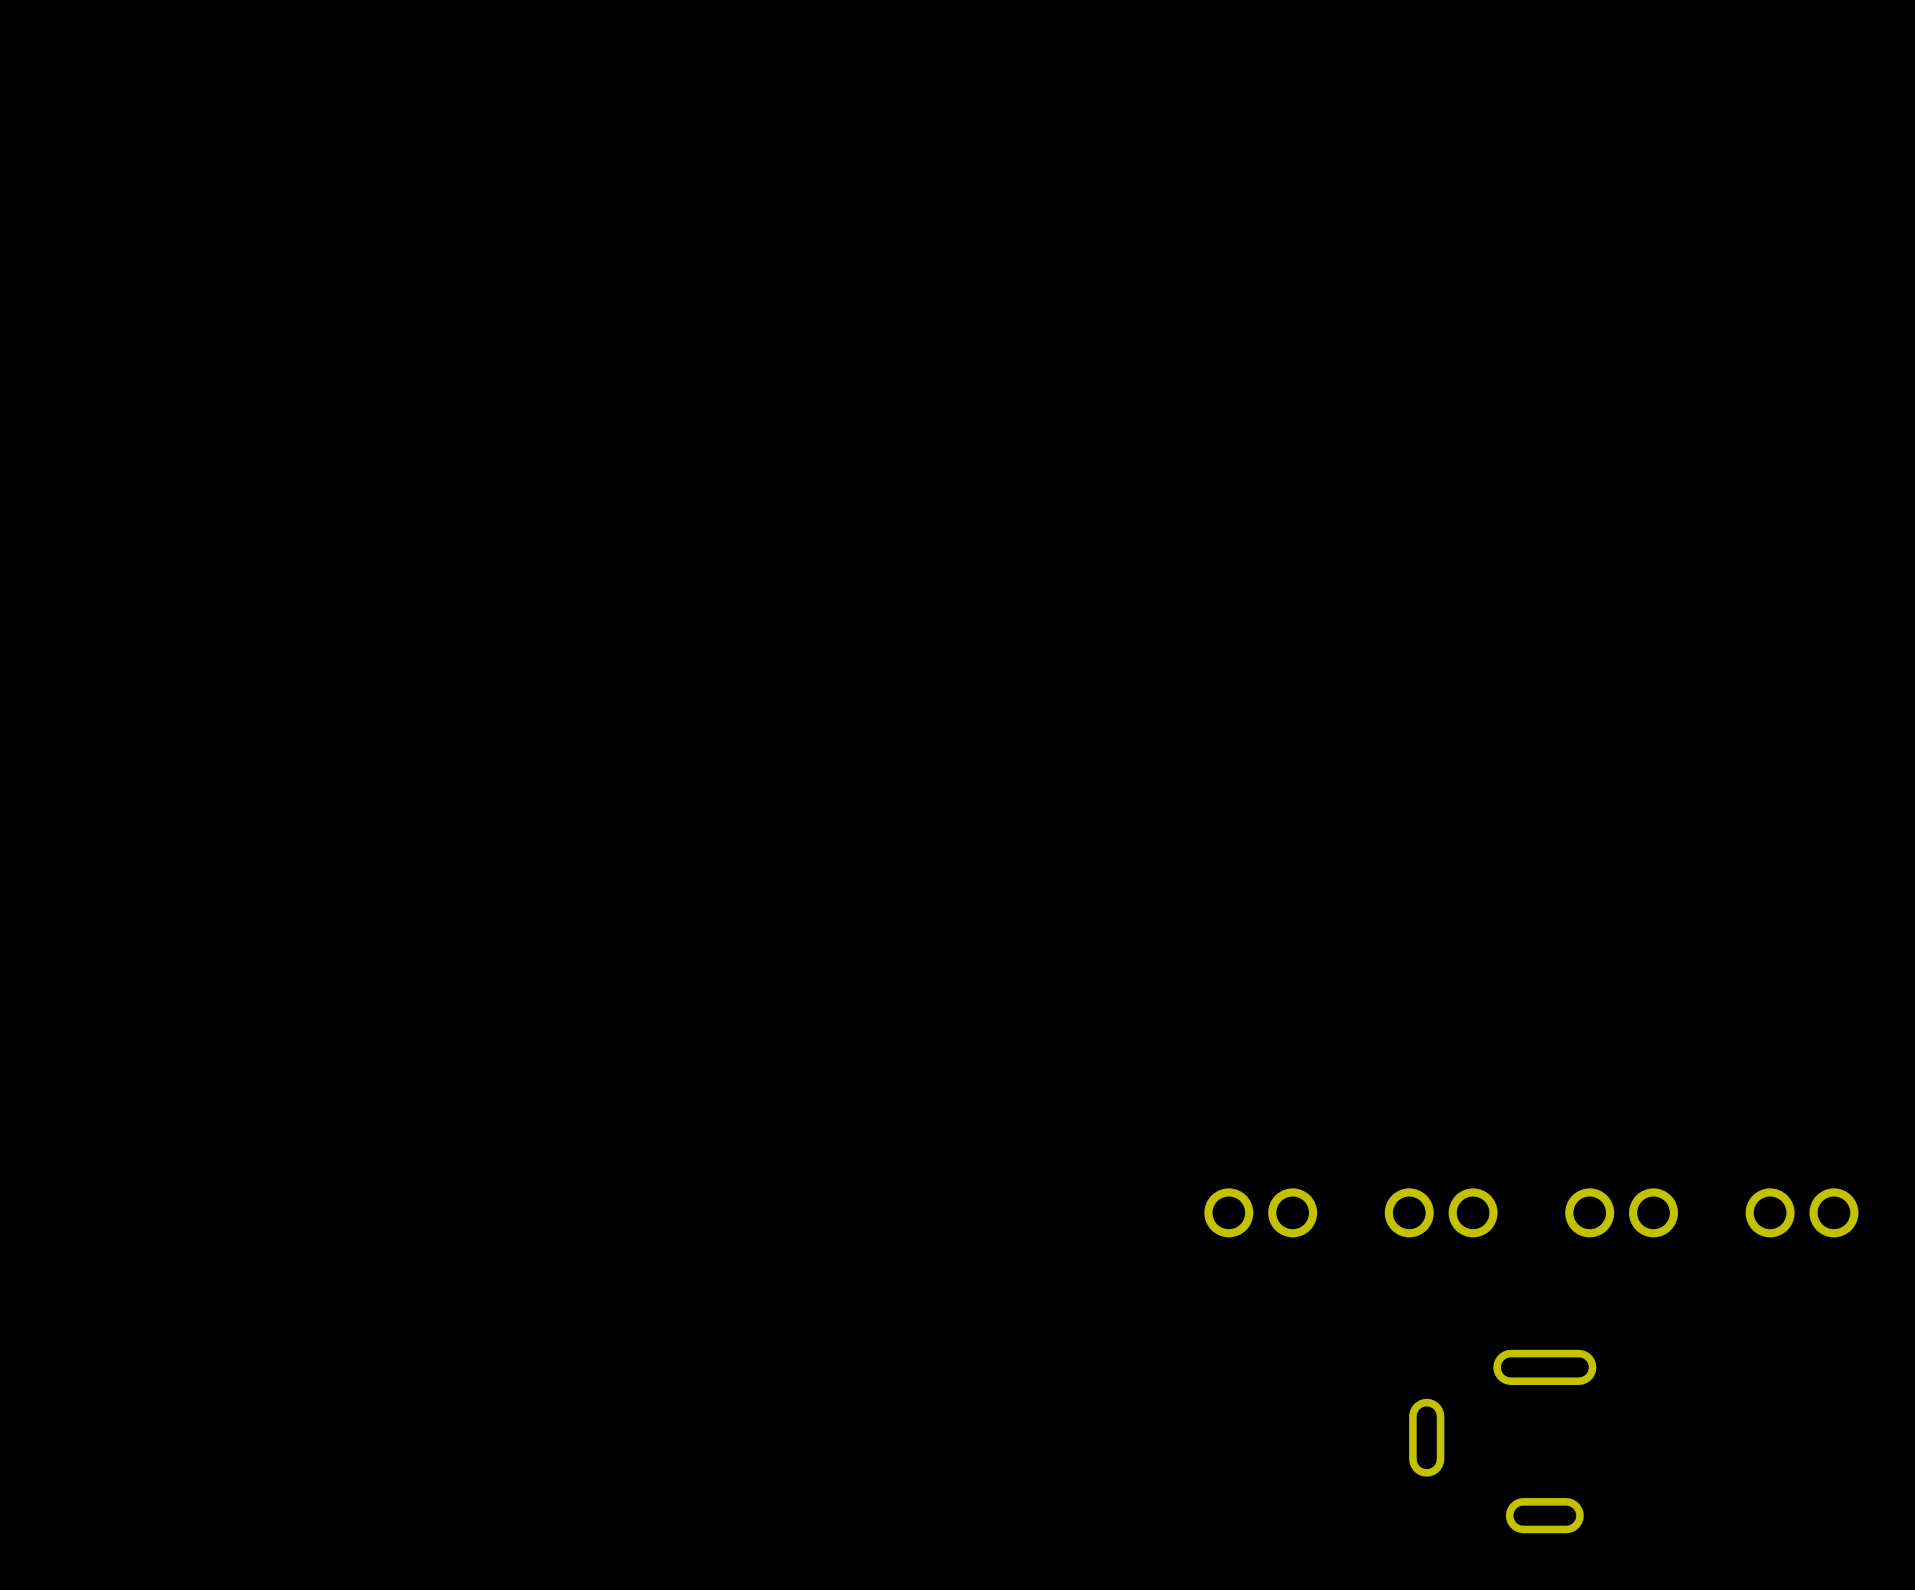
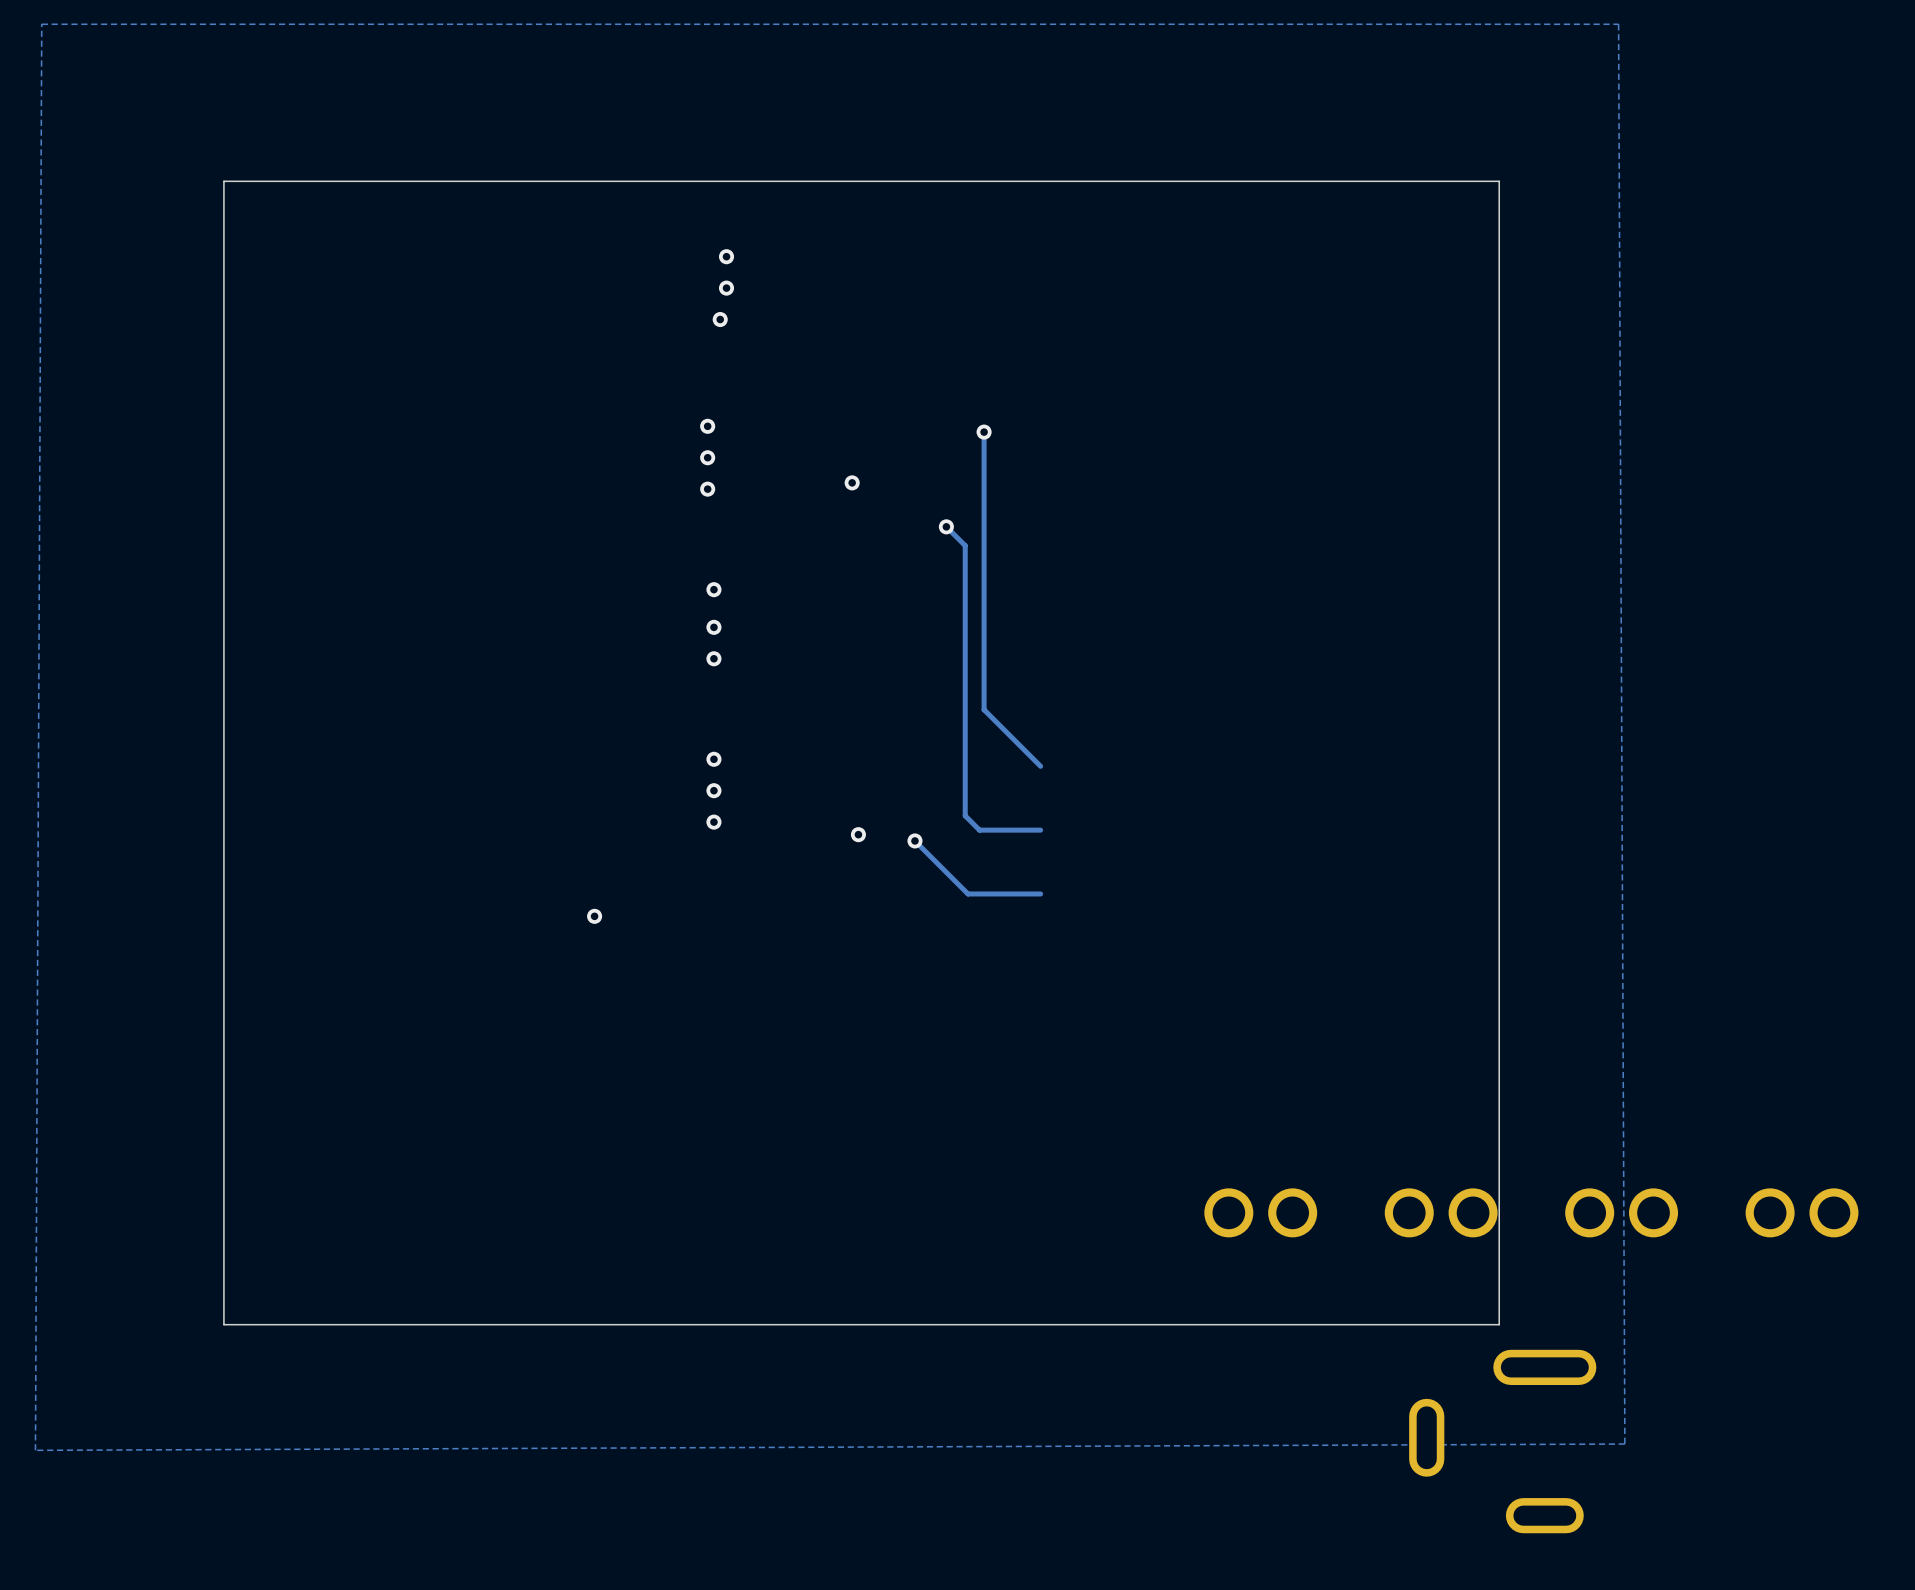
zone outline: none -> (1618, 24) (1624, 1444) (35, 1450) (41, 24) (1618, 24)
board edge: none -> (1499, 181) (223, 181) (223, 1324) (1499, 1324) (1499, 181)
via: none -> (726, 256)
via: none -> (726, 288)
via: none -> (720, 319)
via: none -> (707, 426)
track: none -> (984, 432) (984, 709) (1040, 766)
via: none -> (984, 432)
via: none -> (707, 457)
via: none -> (852, 482)
via: none -> (707, 489)
track: none -> (946, 526) (965, 545) (965, 815) (979, 830) (1040, 830)
via: none -> (946, 526)
via: none -> (713, 589)
via: none -> (713, 627)
via: none -> (713, 658)
via: none -> (713, 759)
via: none -> (713, 790)
via: none -> (713, 822)
via: none -> (858, 834)
track: none -> (914, 840) (968, 893) (1040, 893)
via: none -> (914, 840)
via: none -> (594, 916)

